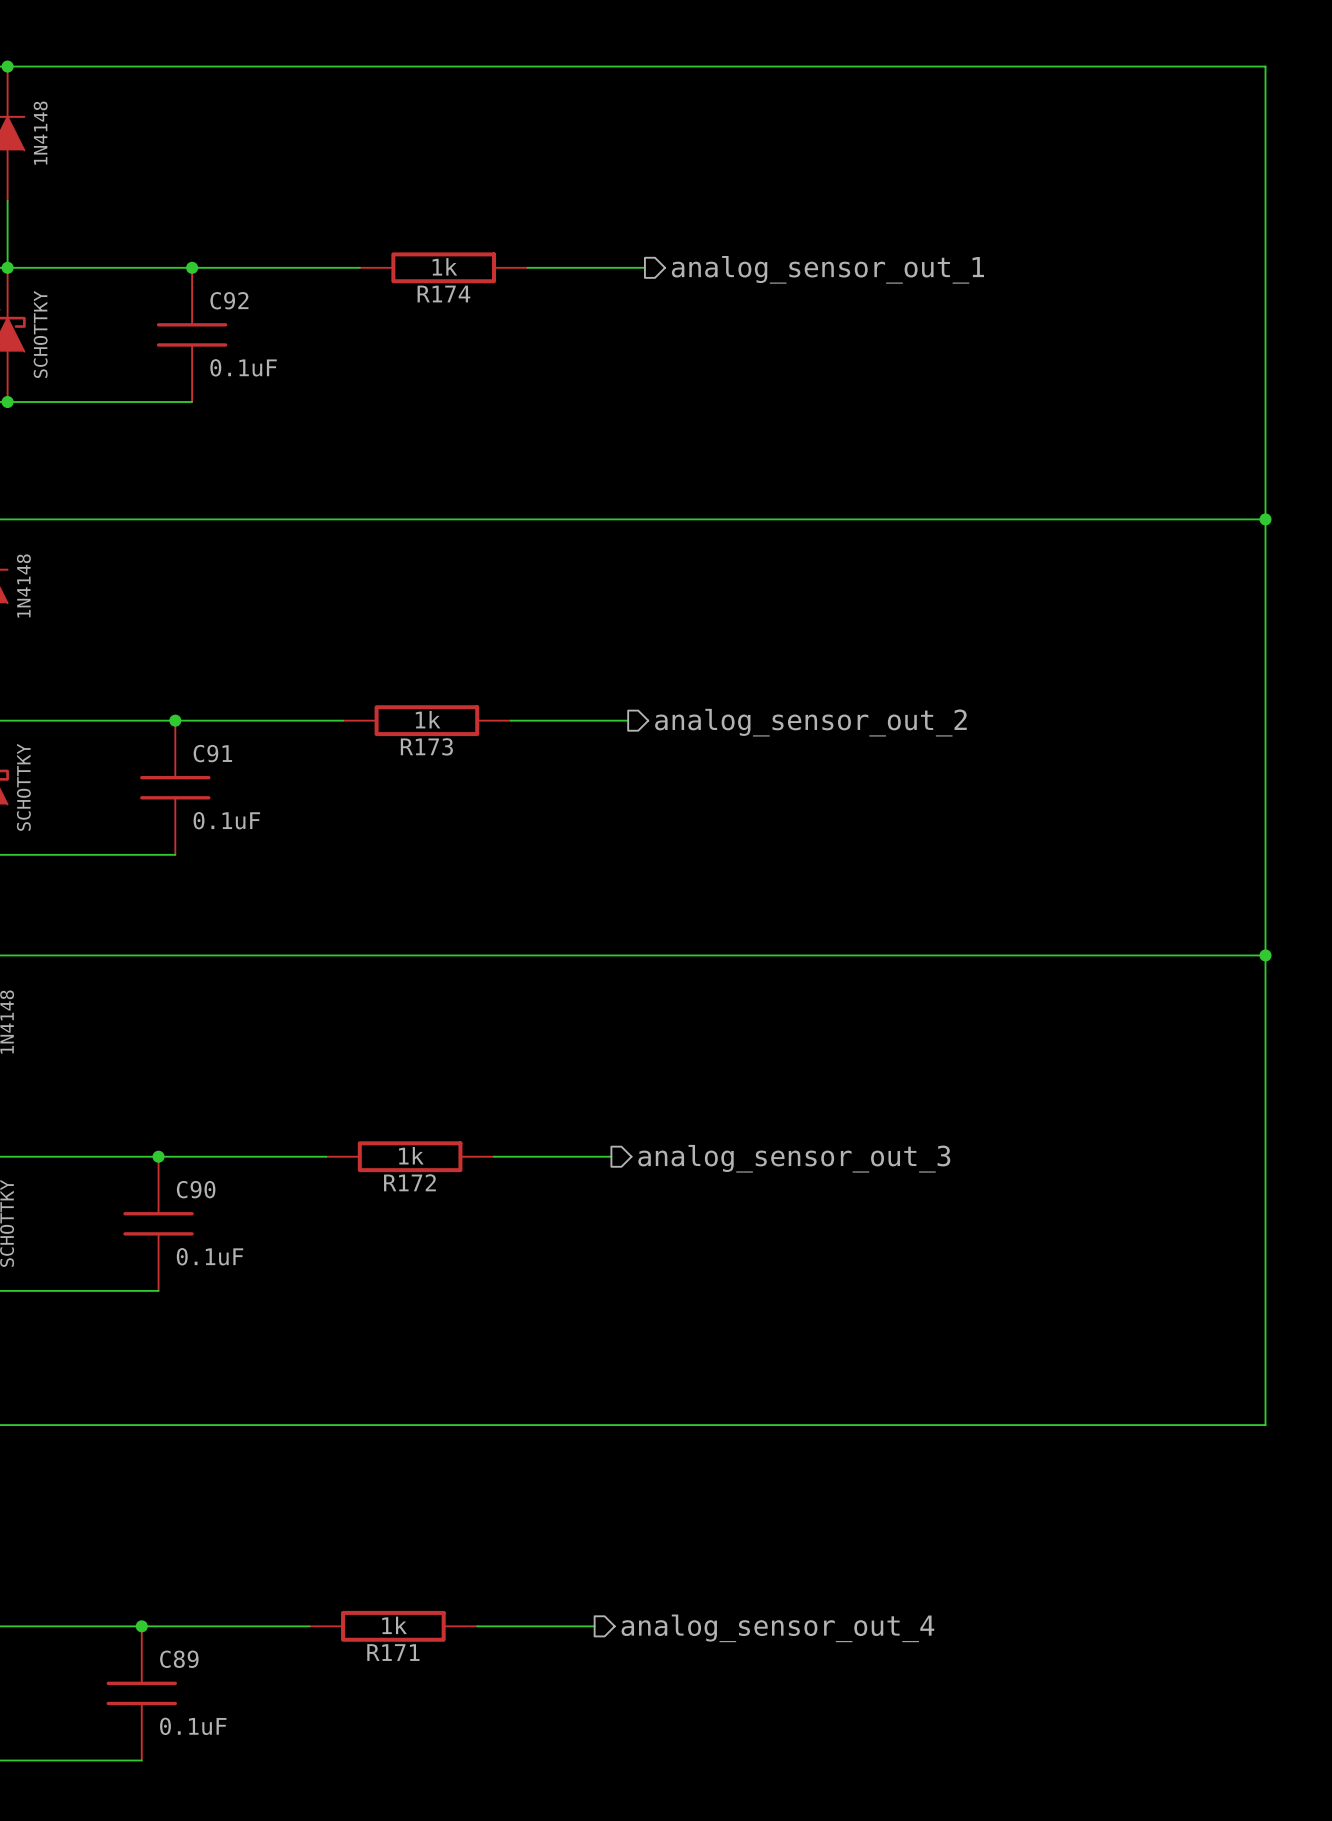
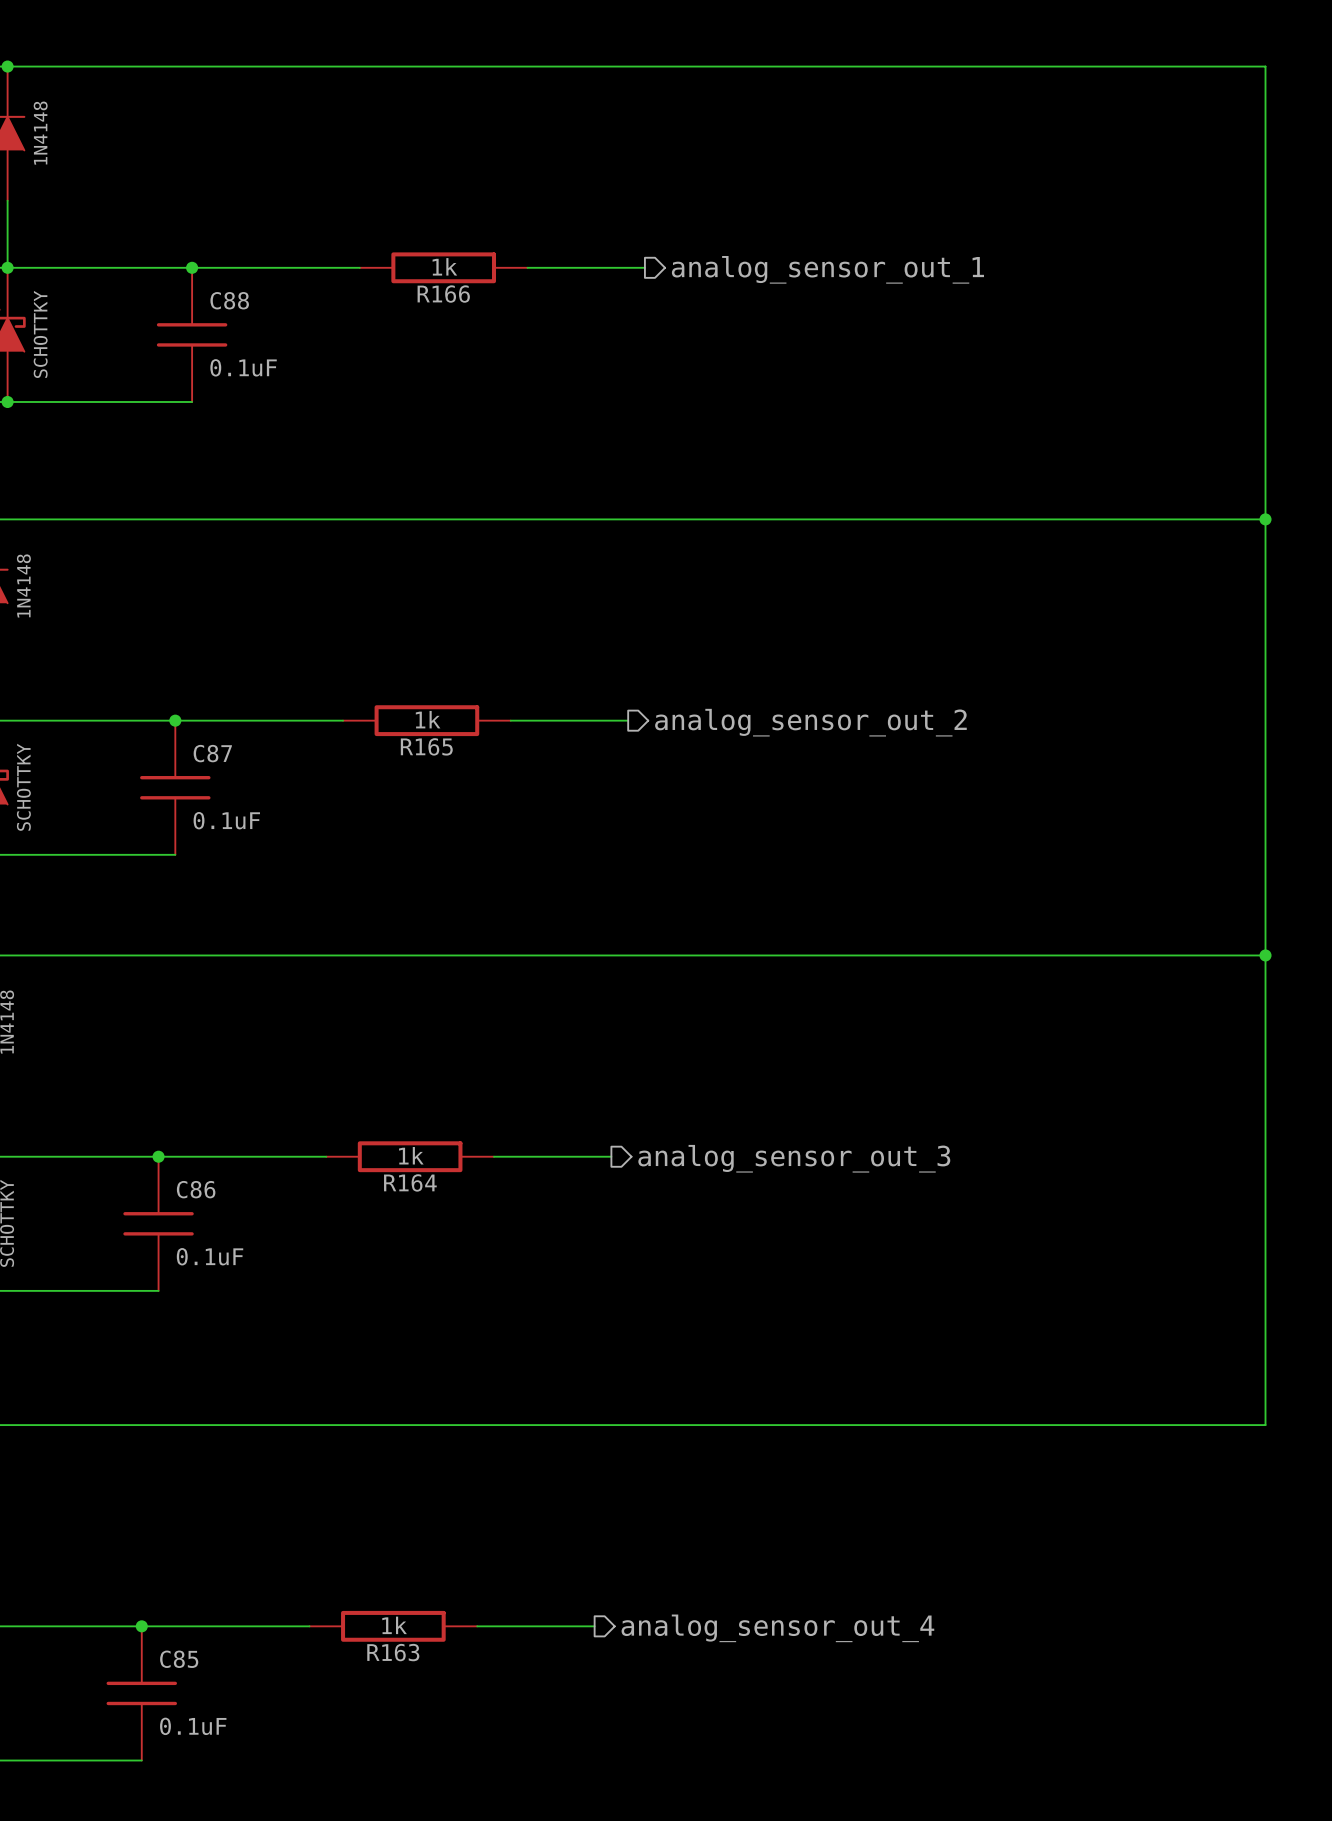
R174 name: R174 (443, 294) -> R166 (443, 294)
C92 name: C92 (229, 300) -> C88 (229, 300)
R173 name: R173 (426, 746) -> R165 (426, 746)
C91 name: C91 (212, 753) -> C87 (212, 753)
R172 name: R172 (409, 1182) -> R164 (410, 1182)
C90 name: C90 (196, 1189) -> C86 (196, 1189)
R171 name: R171 (393, 1652) -> R163 (393, 1652)
C89 name: C89 (179, 1659) -> C85 (179, 1659)

